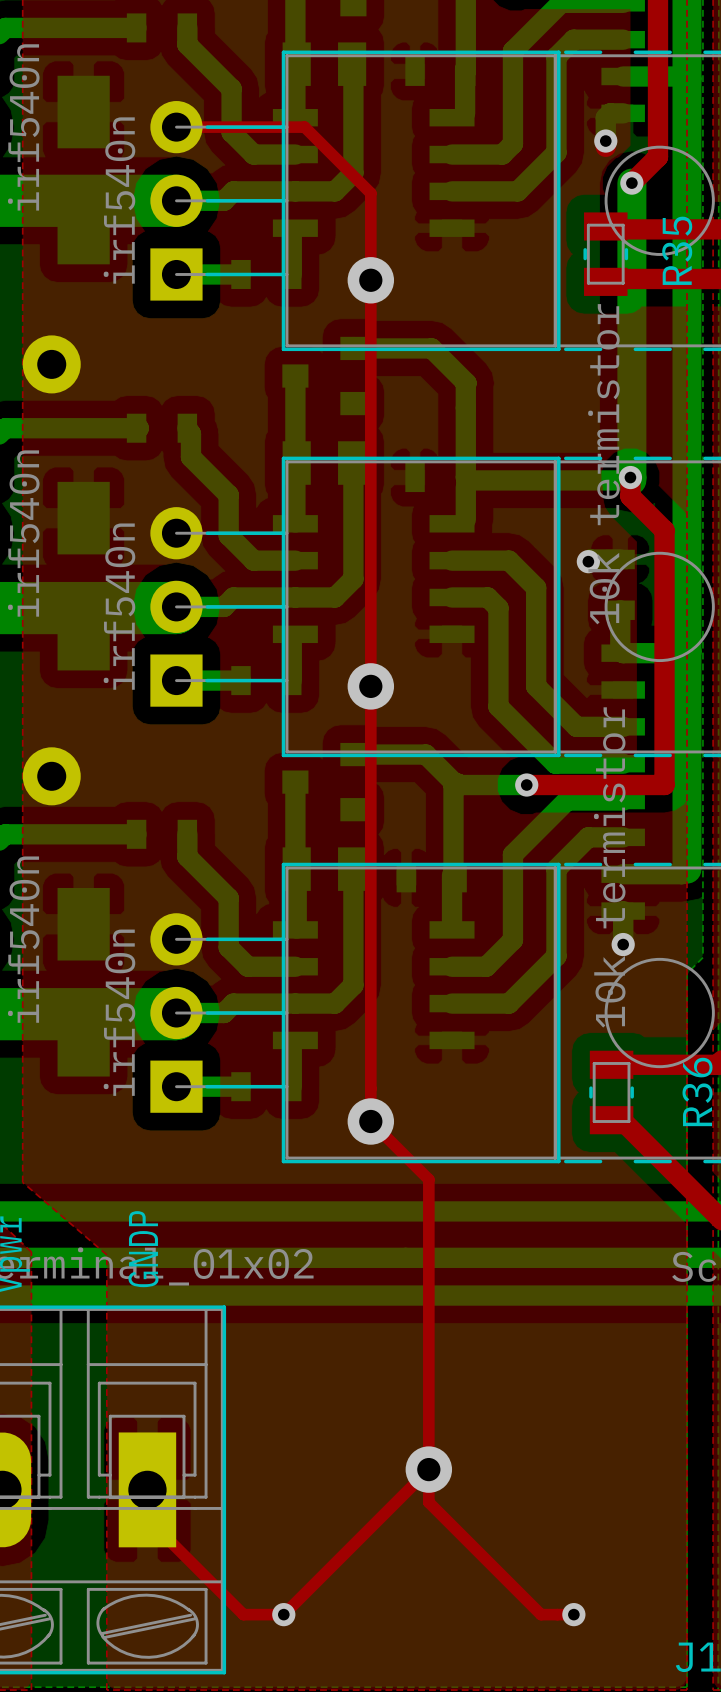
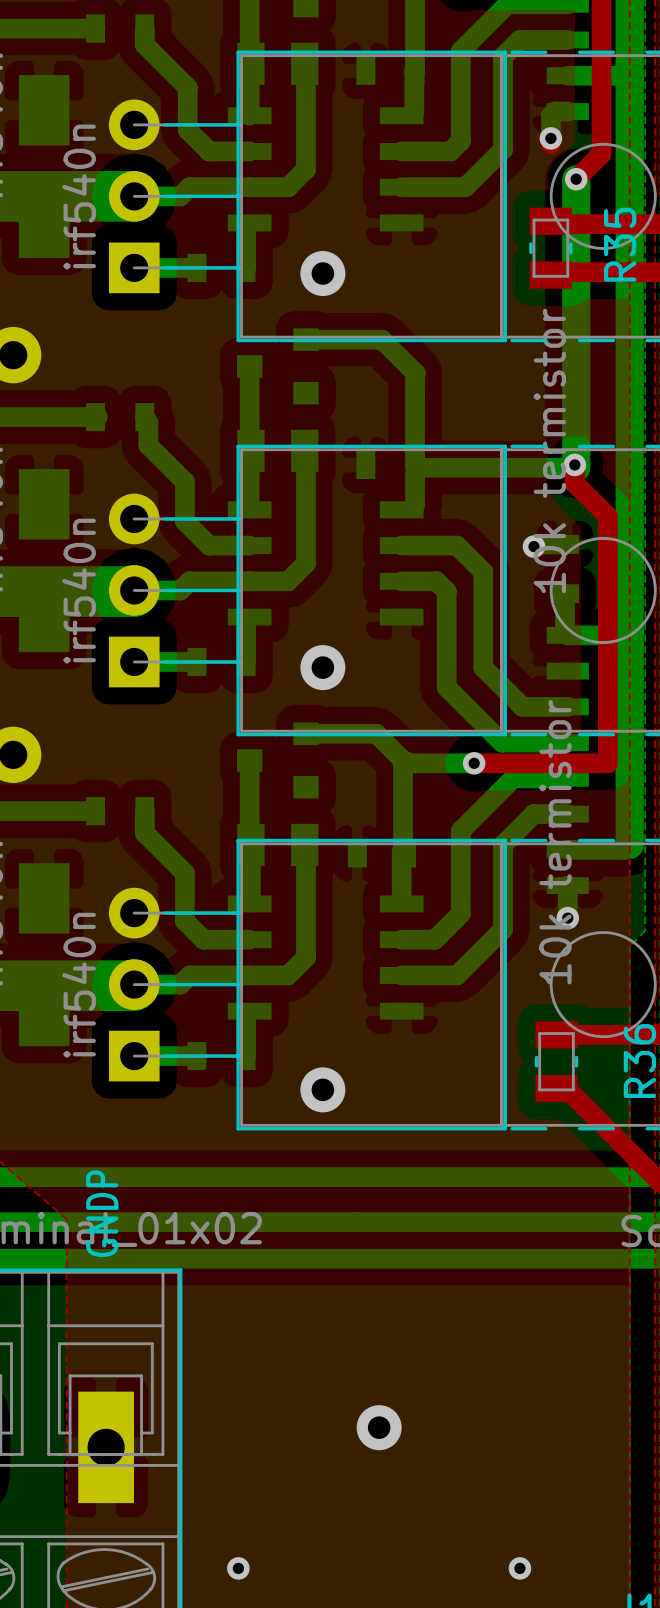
top track: (176, 127) (304, 127) (370, 193) (370, 1121) (428, 1179) (428, 1502) (541, 1614) (573, 1614) -> none
top track: (428, 1469) (283, 1614) (243, 1614) (147, 1518) (147, 1489) -> none

